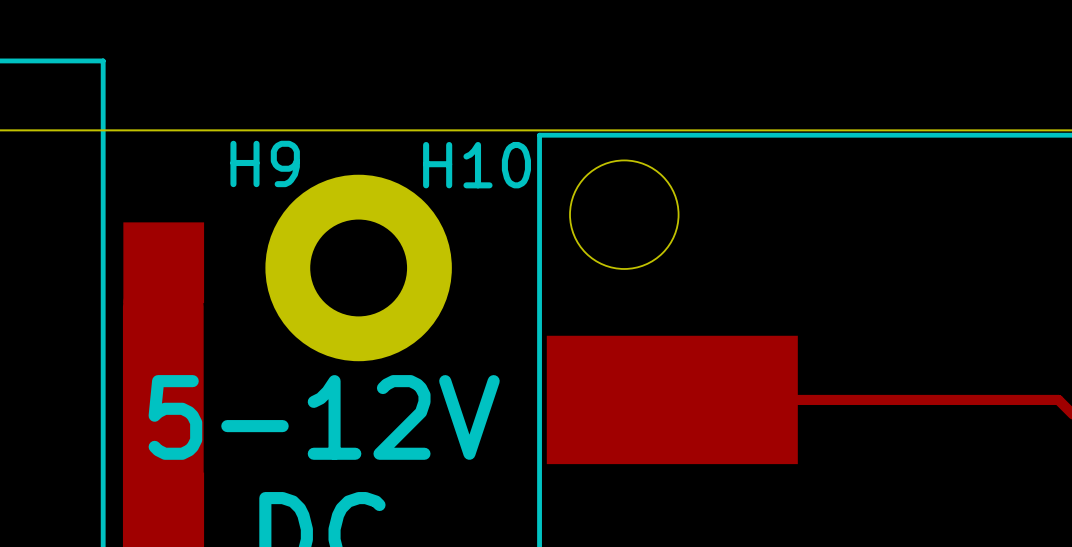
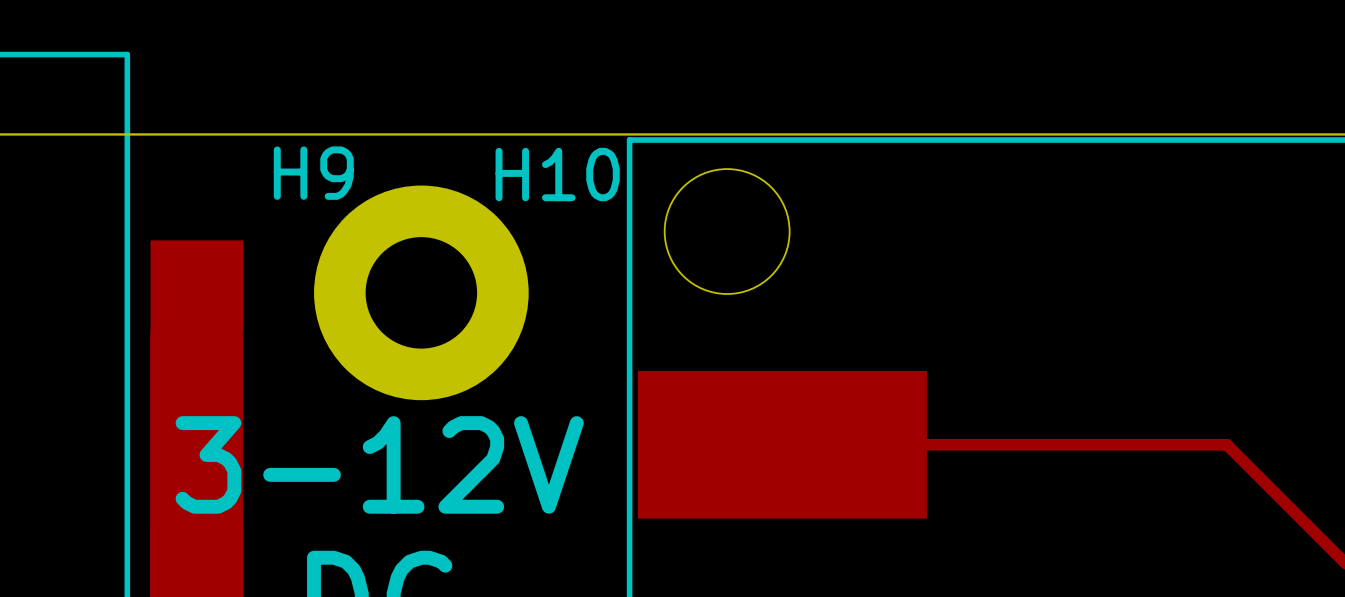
text: 5-12V (324, 417) -> 3-12V (379, 464)

